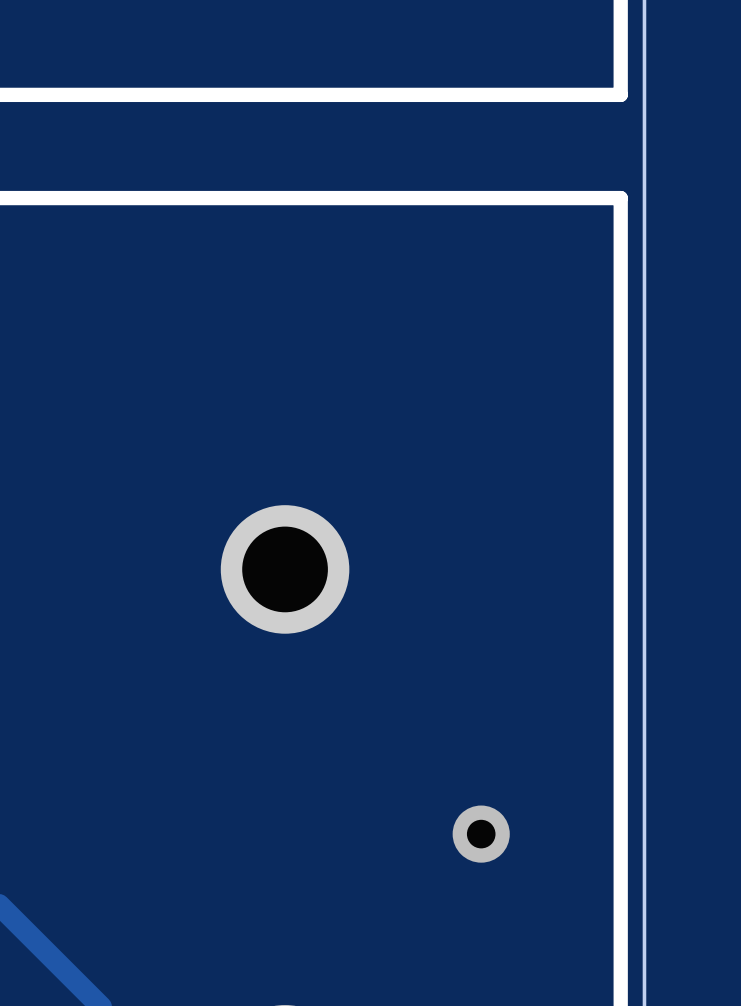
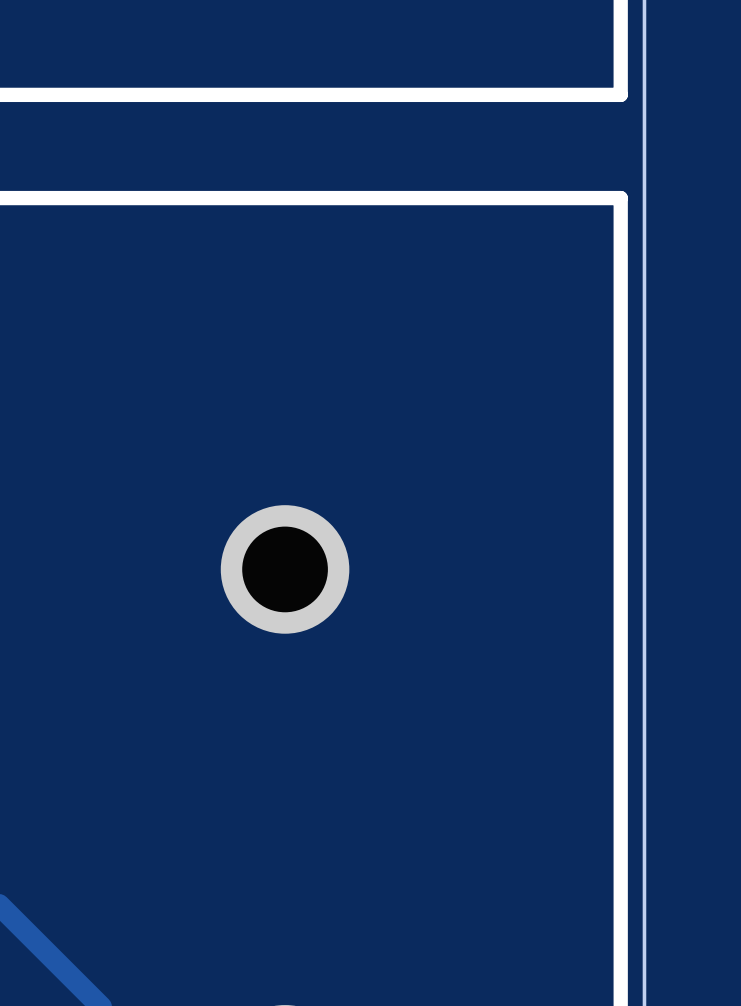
via: (481, 834) -> none

